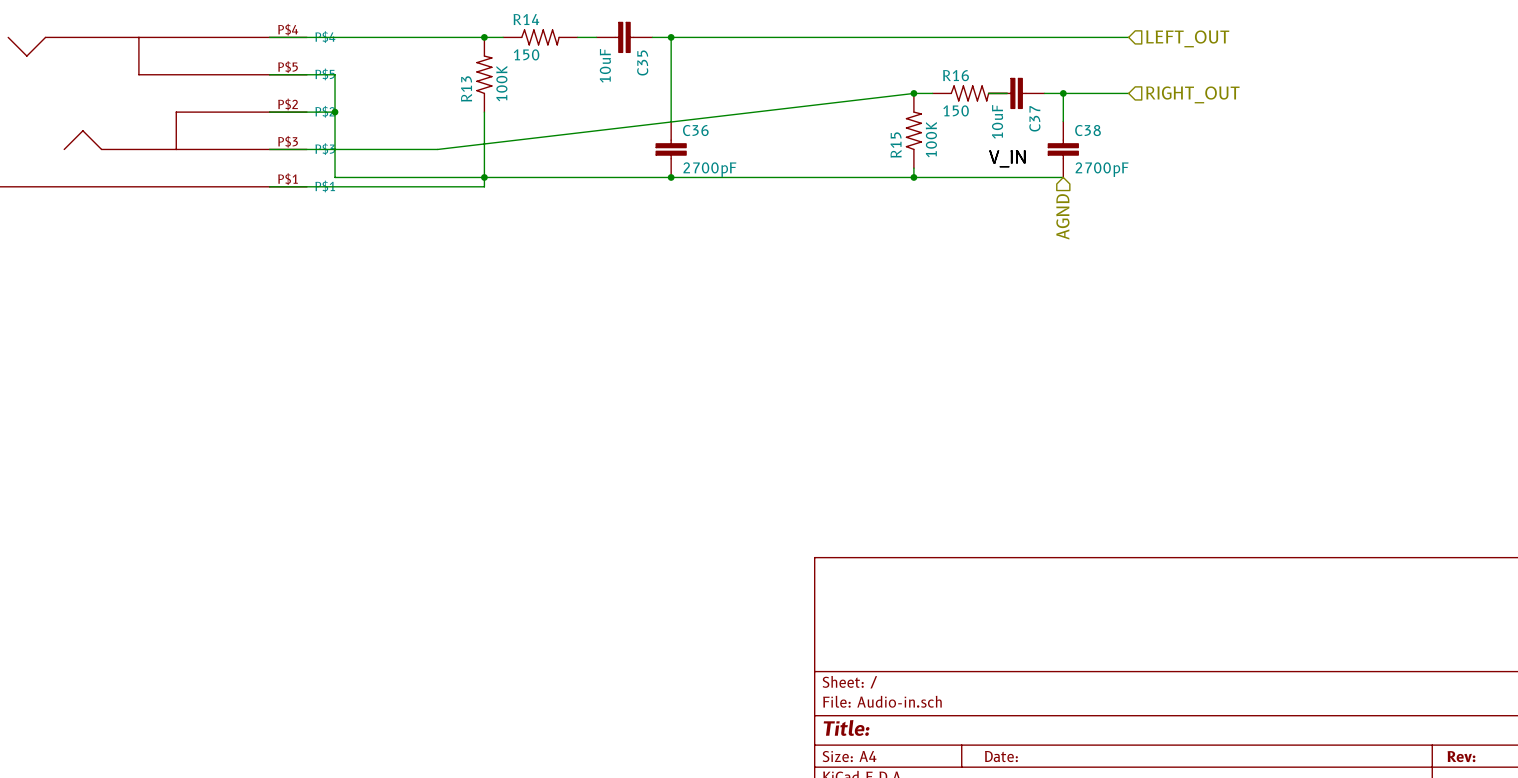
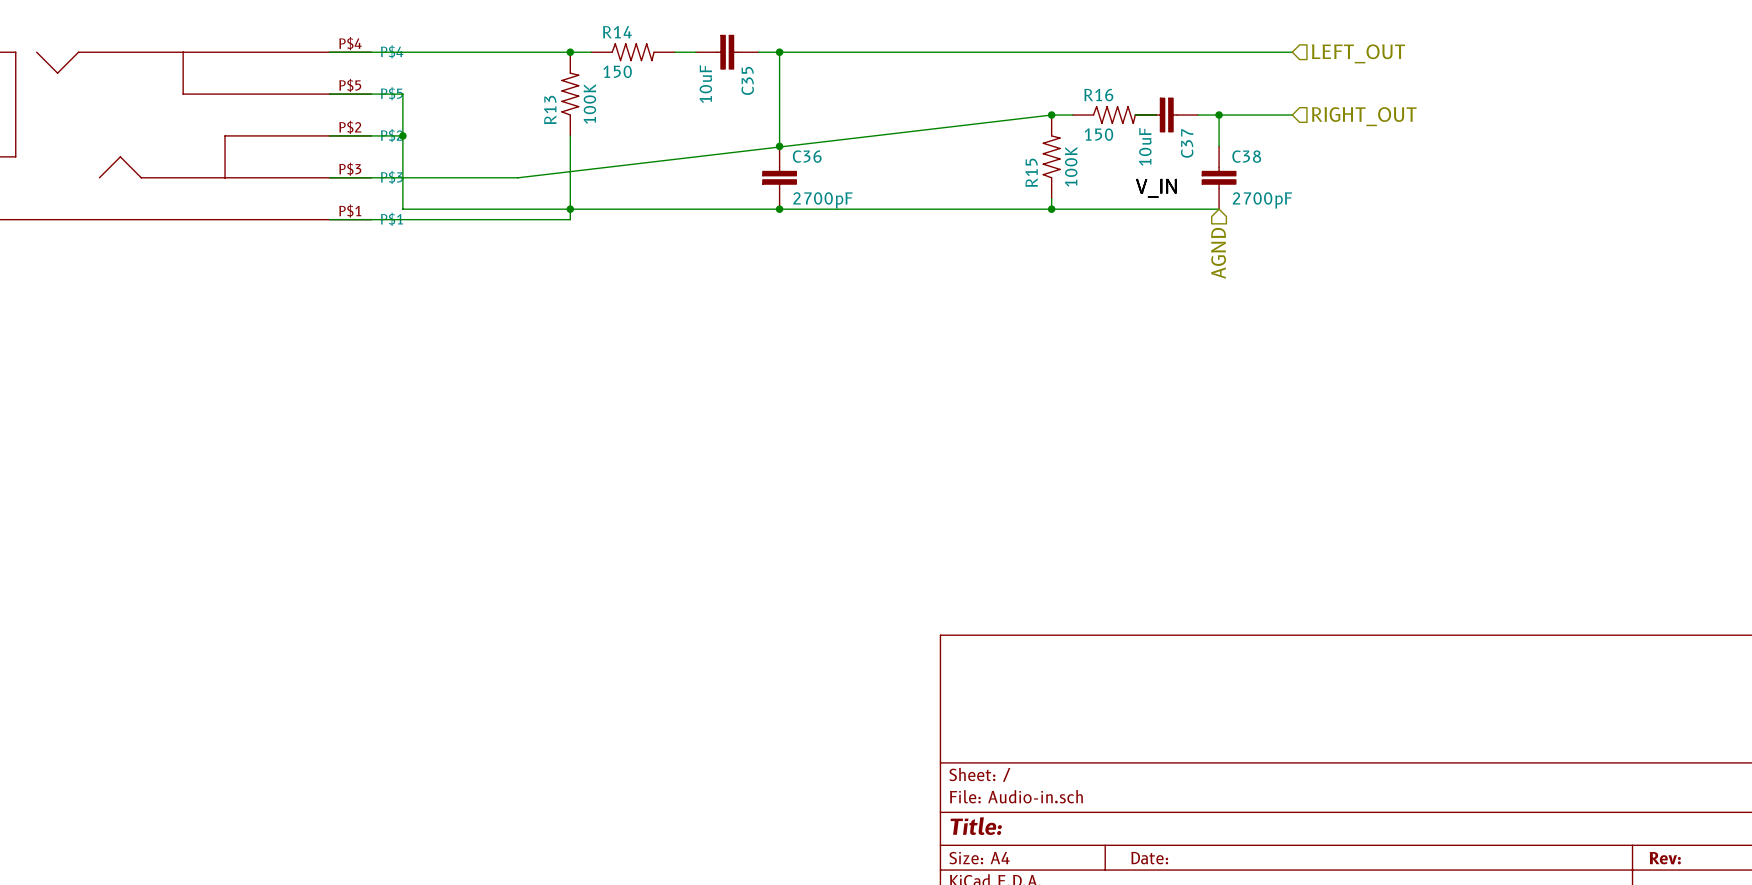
junction: none -> (779, 146)

